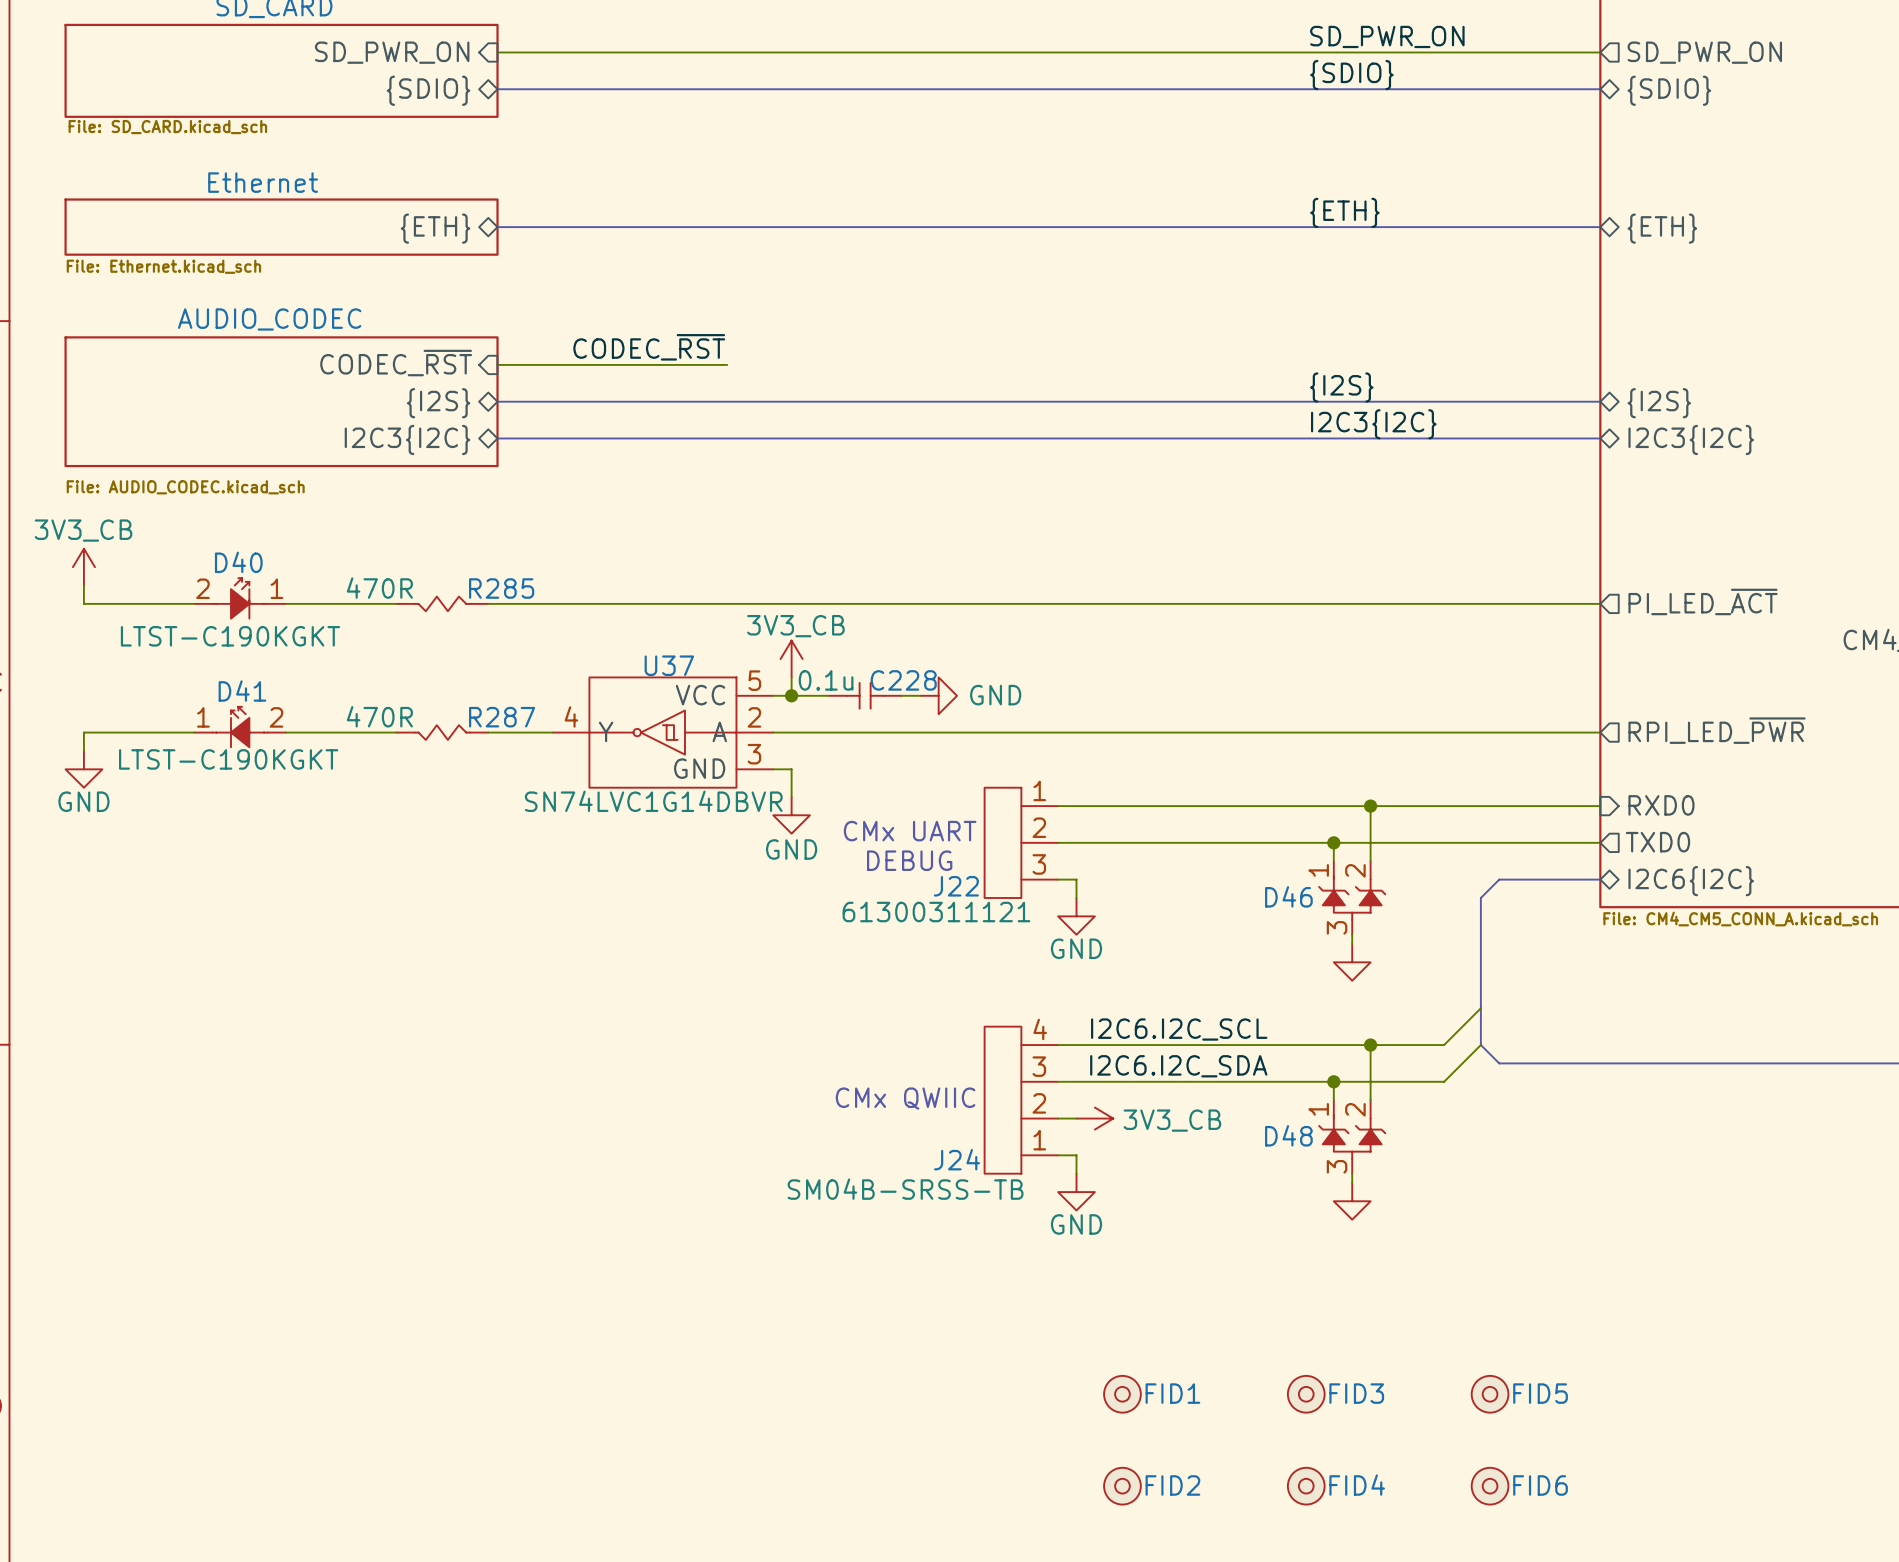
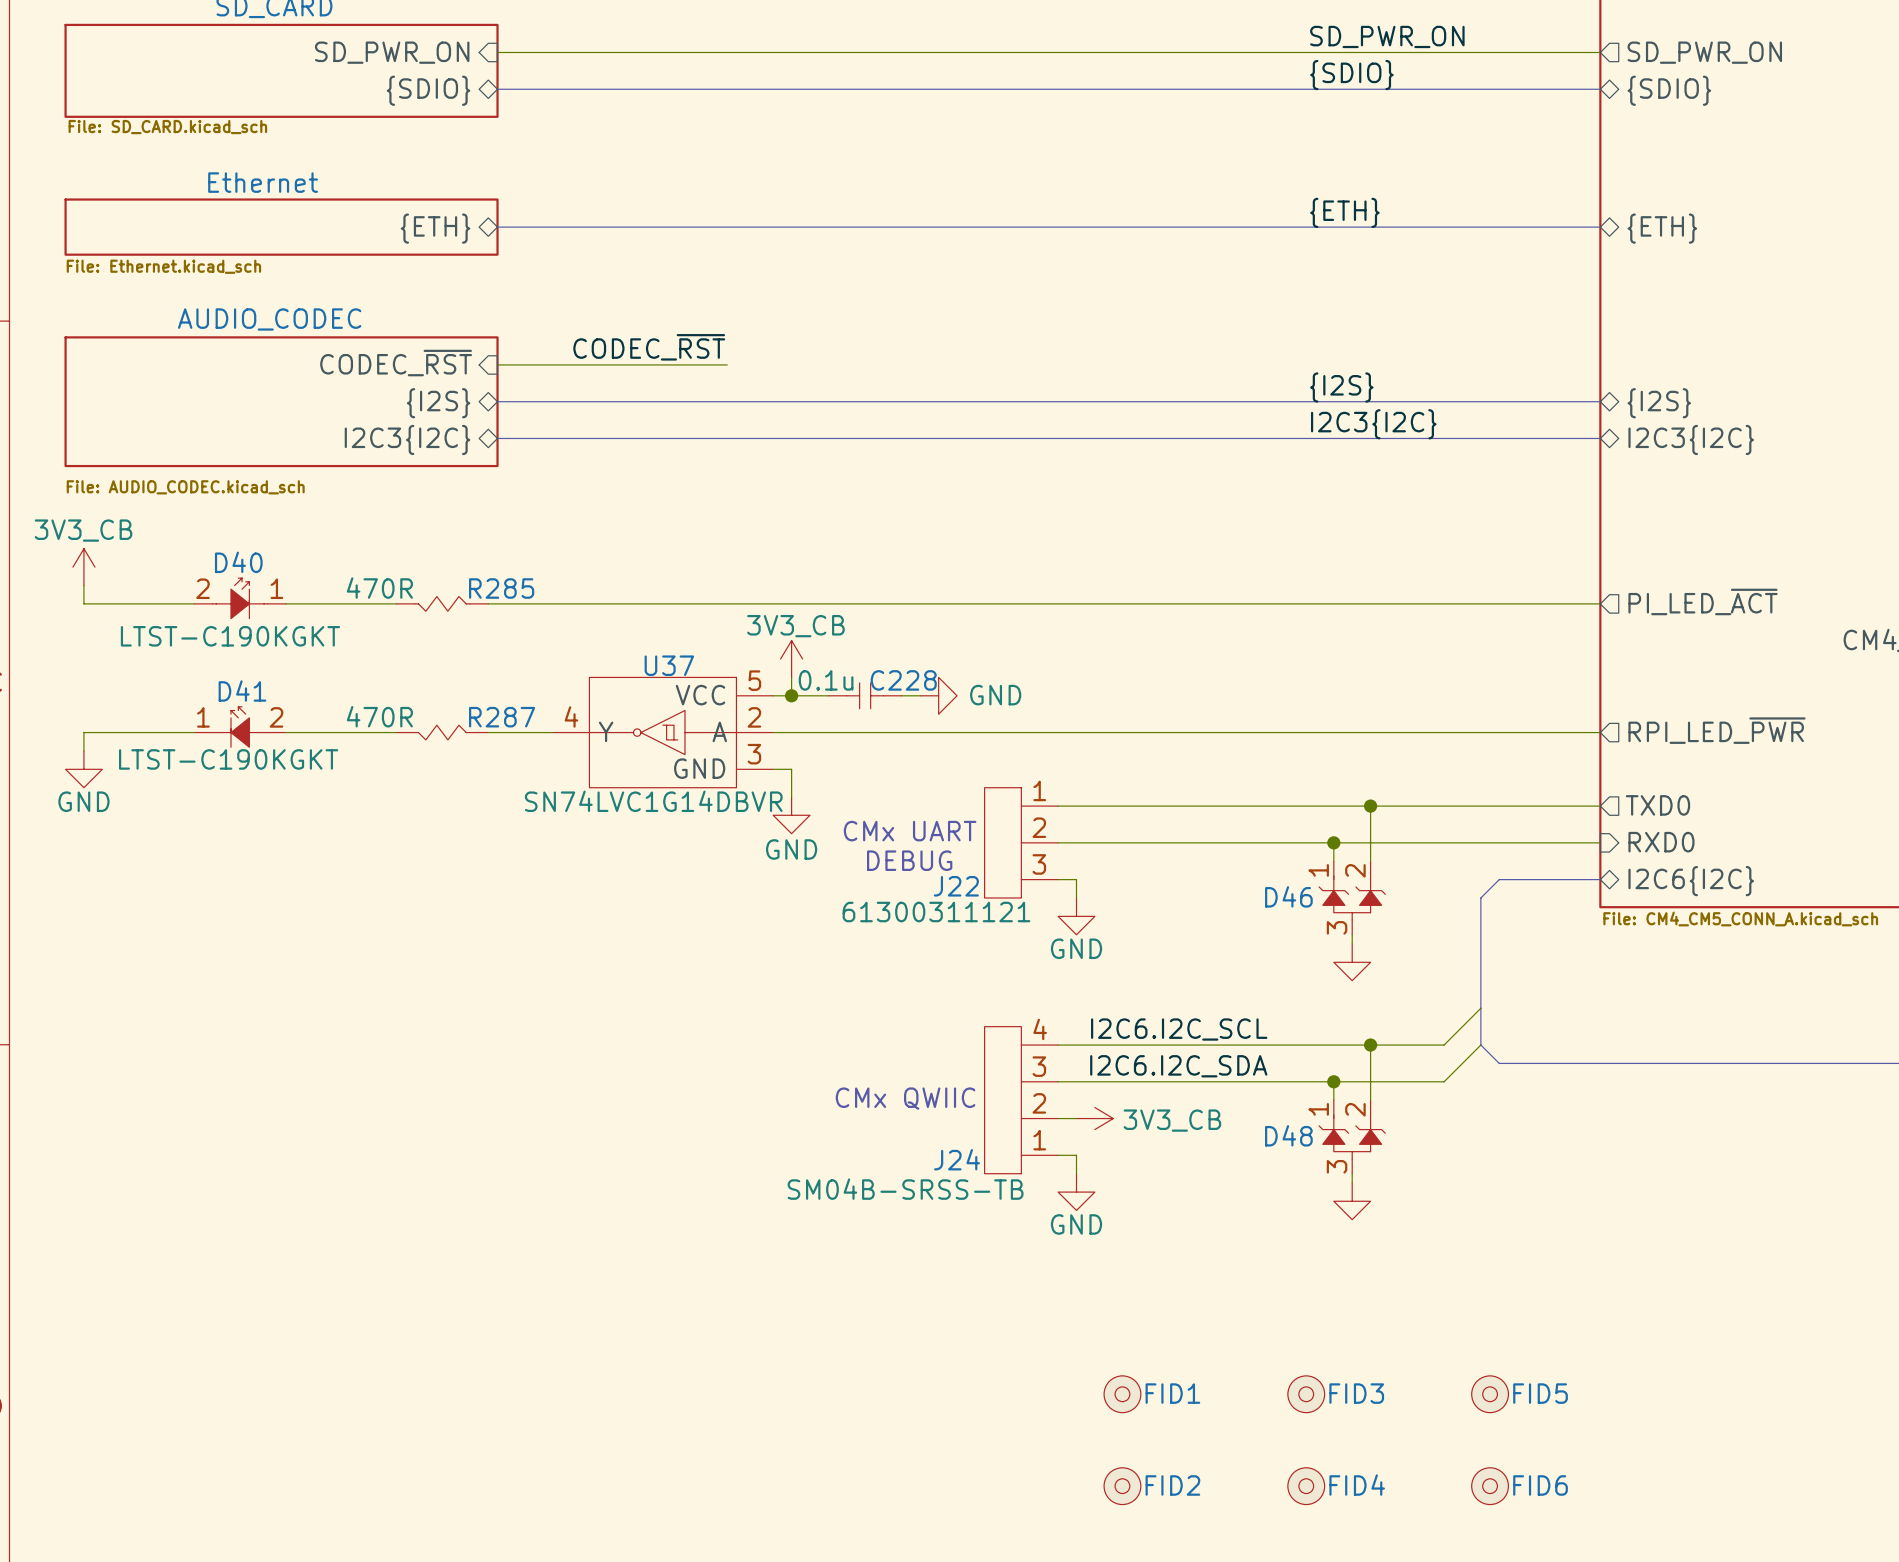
sheet pin shape: input (1661, 805) -> output (1657, 805)
sheet pin: RXD0 (1661, 805) -> TXD0 (1657, 805)
sheet pin shape: output (1657, 842) -> input (1661, 842)
sheet pin: TXD0 (1657, 842) -> RXD0 (1661, 842)

